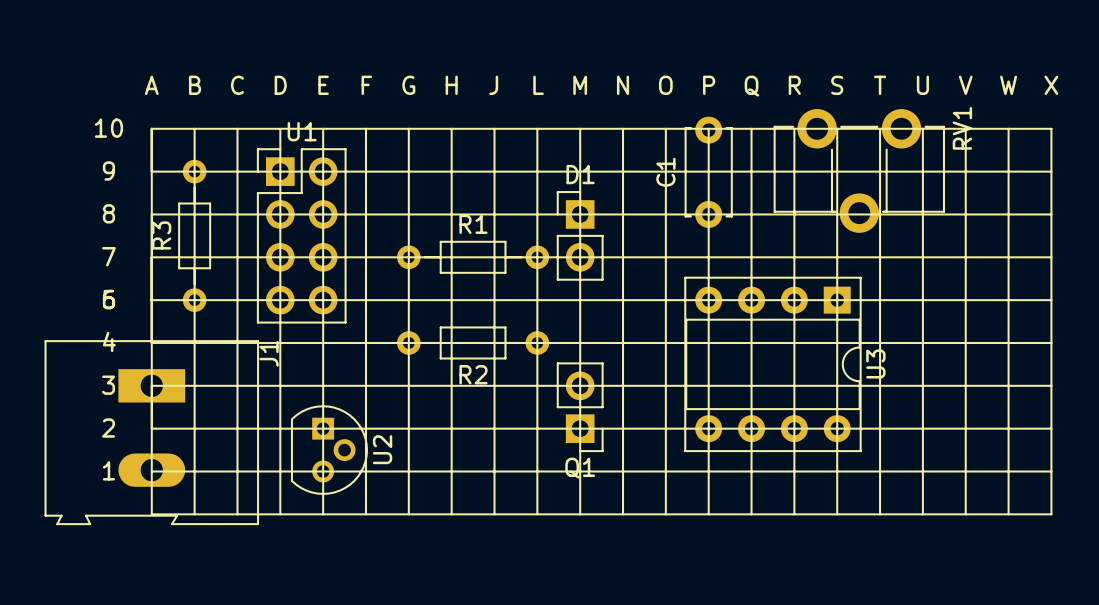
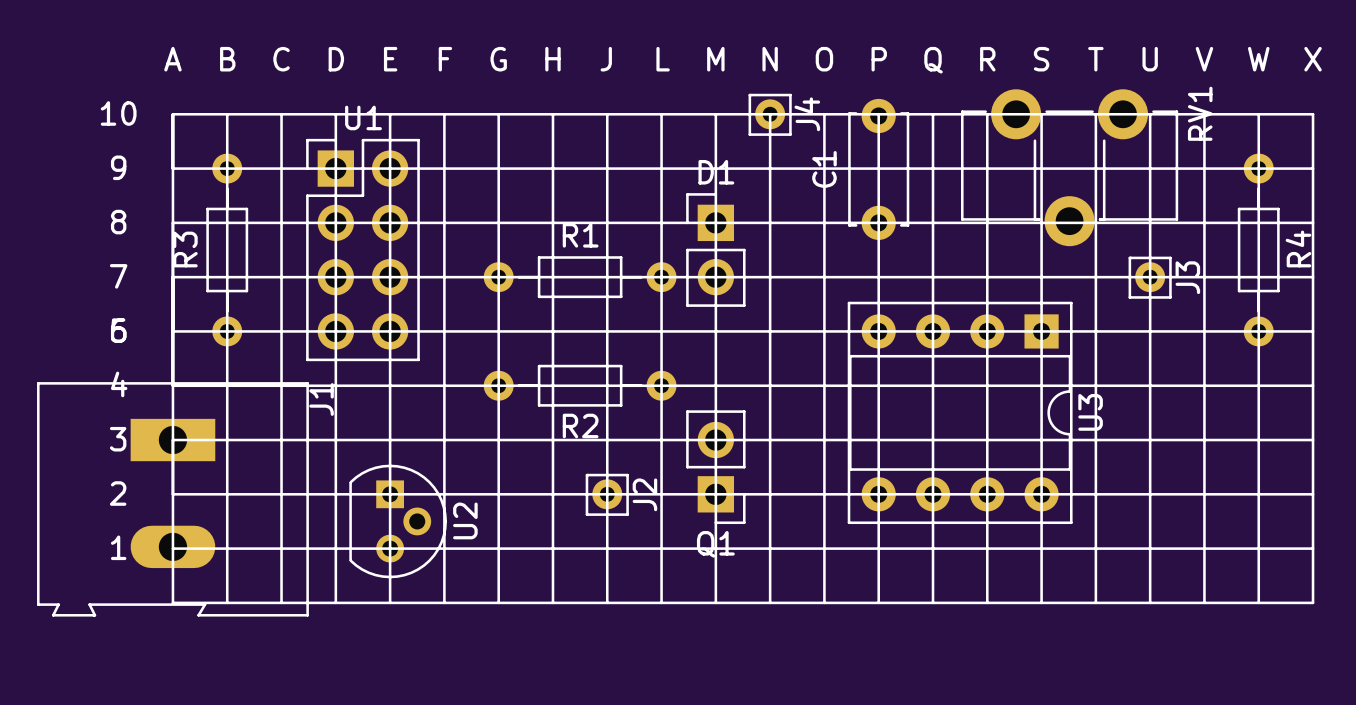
J4: none -> (770, 114)
R4: none -> (1258, 250)
J3: none -> (1150, 277)
J2: none -> (607, 494)

